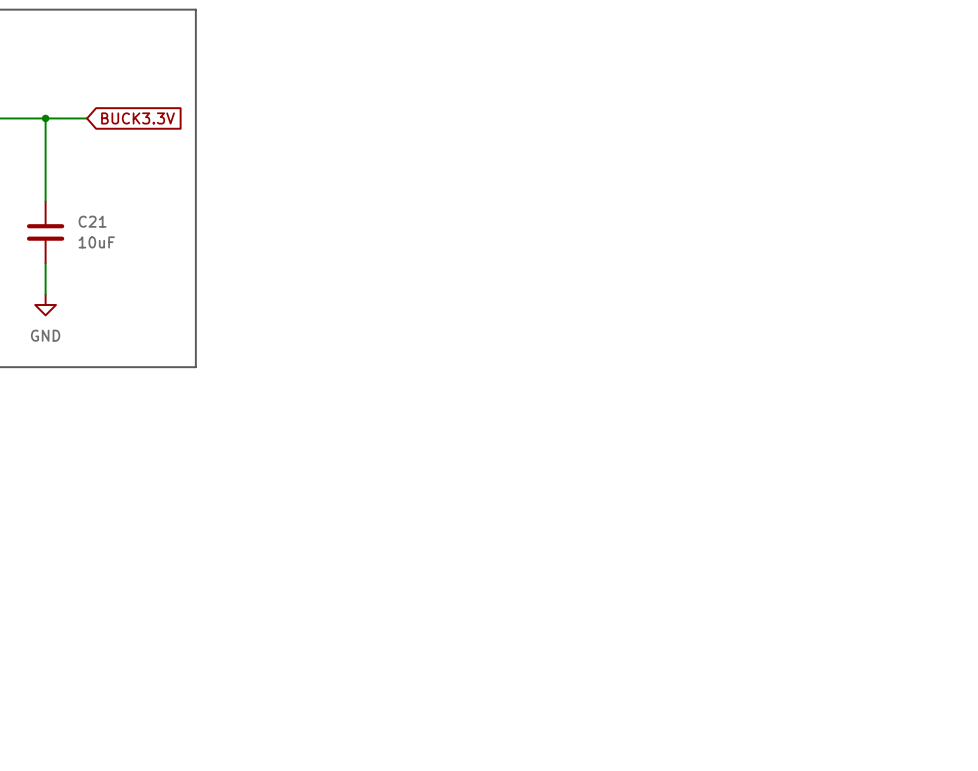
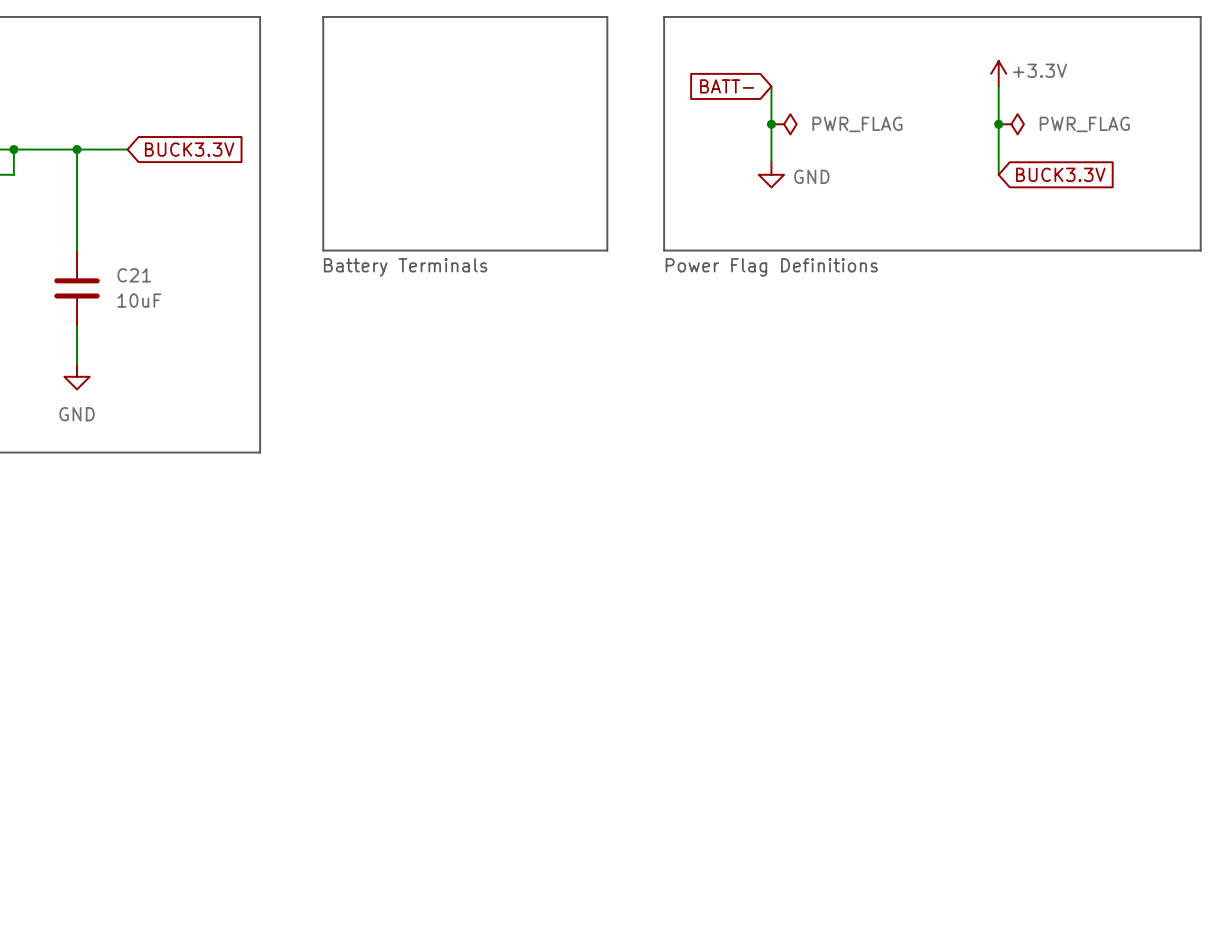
line: none -> (323, 16) (607, 16) (607, 250) (323, 250) (323, 16)
line: none -> (664, 16) (1200, 16) (1200, 250) (664, 250) (664, 16)
power symbol: none -> +3.3V (998, 73)
global label: none -> BATT- (727, 86)
wire: none -> (771, 86) (771, 162)
wire: none -> (998, 86) (998, 174)
junction: none -> (771, 124)
power symbol: none -> PWR_FLAG (784, 124)
junction: none -> (998, 124)
power symbol: none -> PWR_FLAG (1011, 124)
power symbol: none -> GND (771, 174)
global label: none -> BUCK3.3V (1060, 174)
text: none -> Battery Terminals (405, 267)
text: none -> Power Flag Definitions (771, 267)

